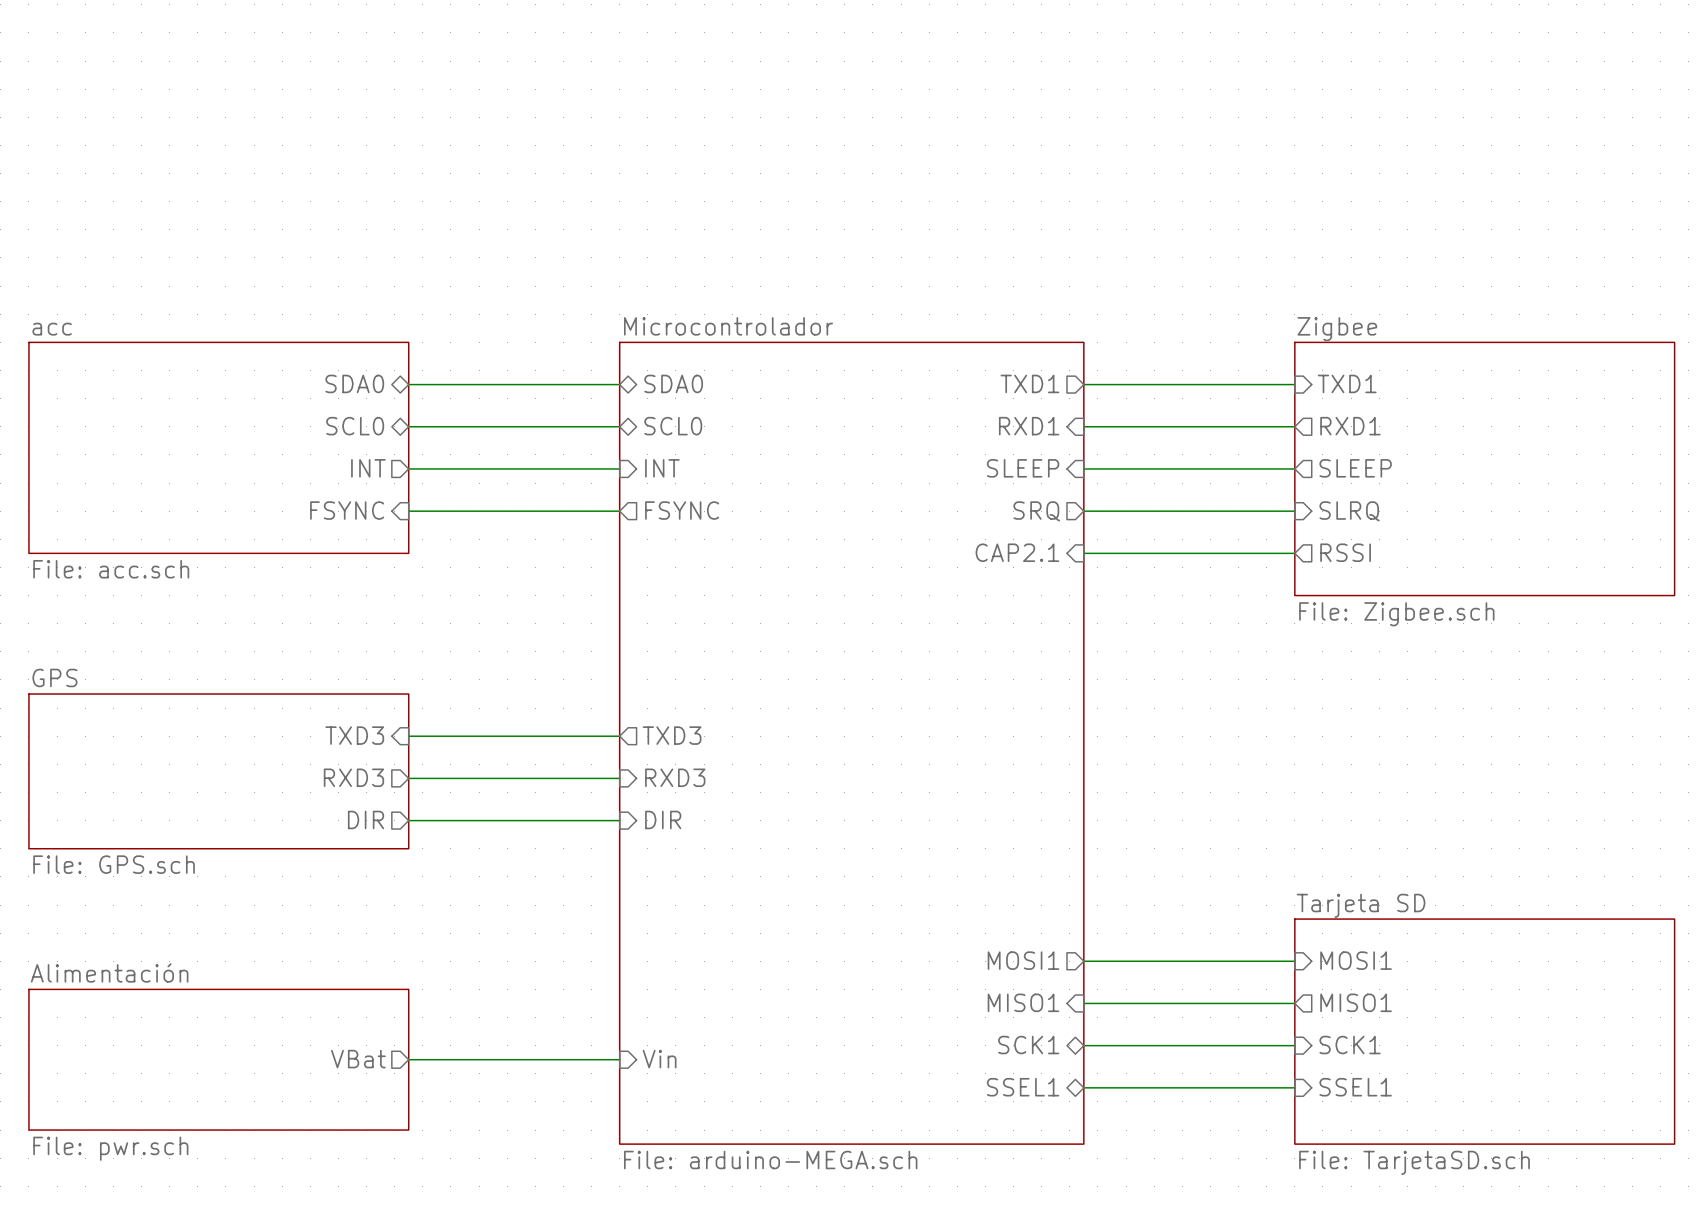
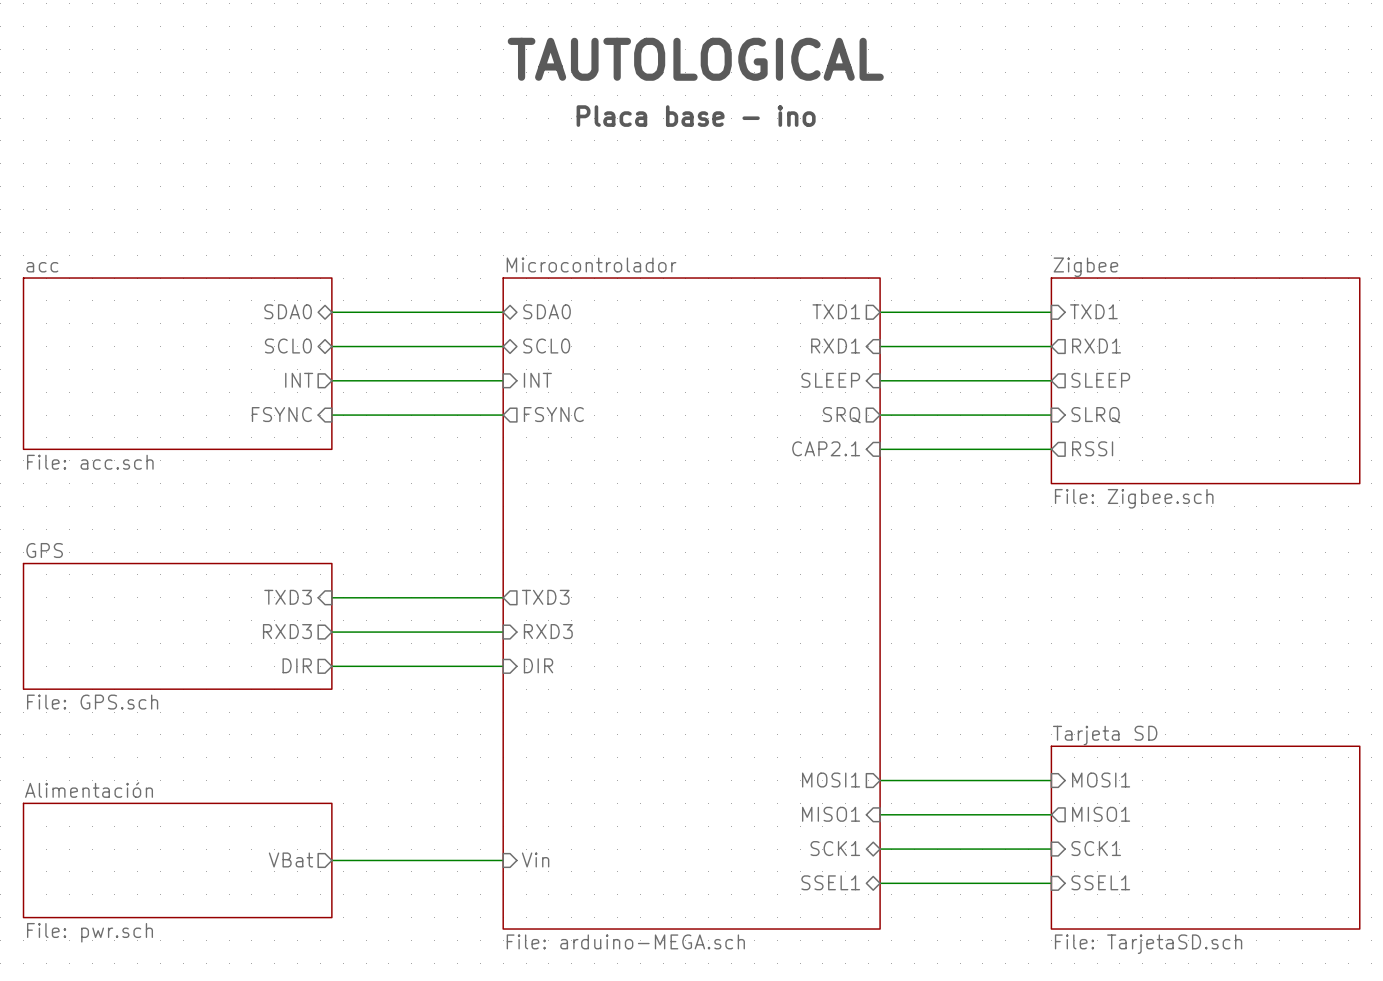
text: none -> TAUTOLOGICAL (695, 59)
text: none -> Placa base - ino (696, 116)

